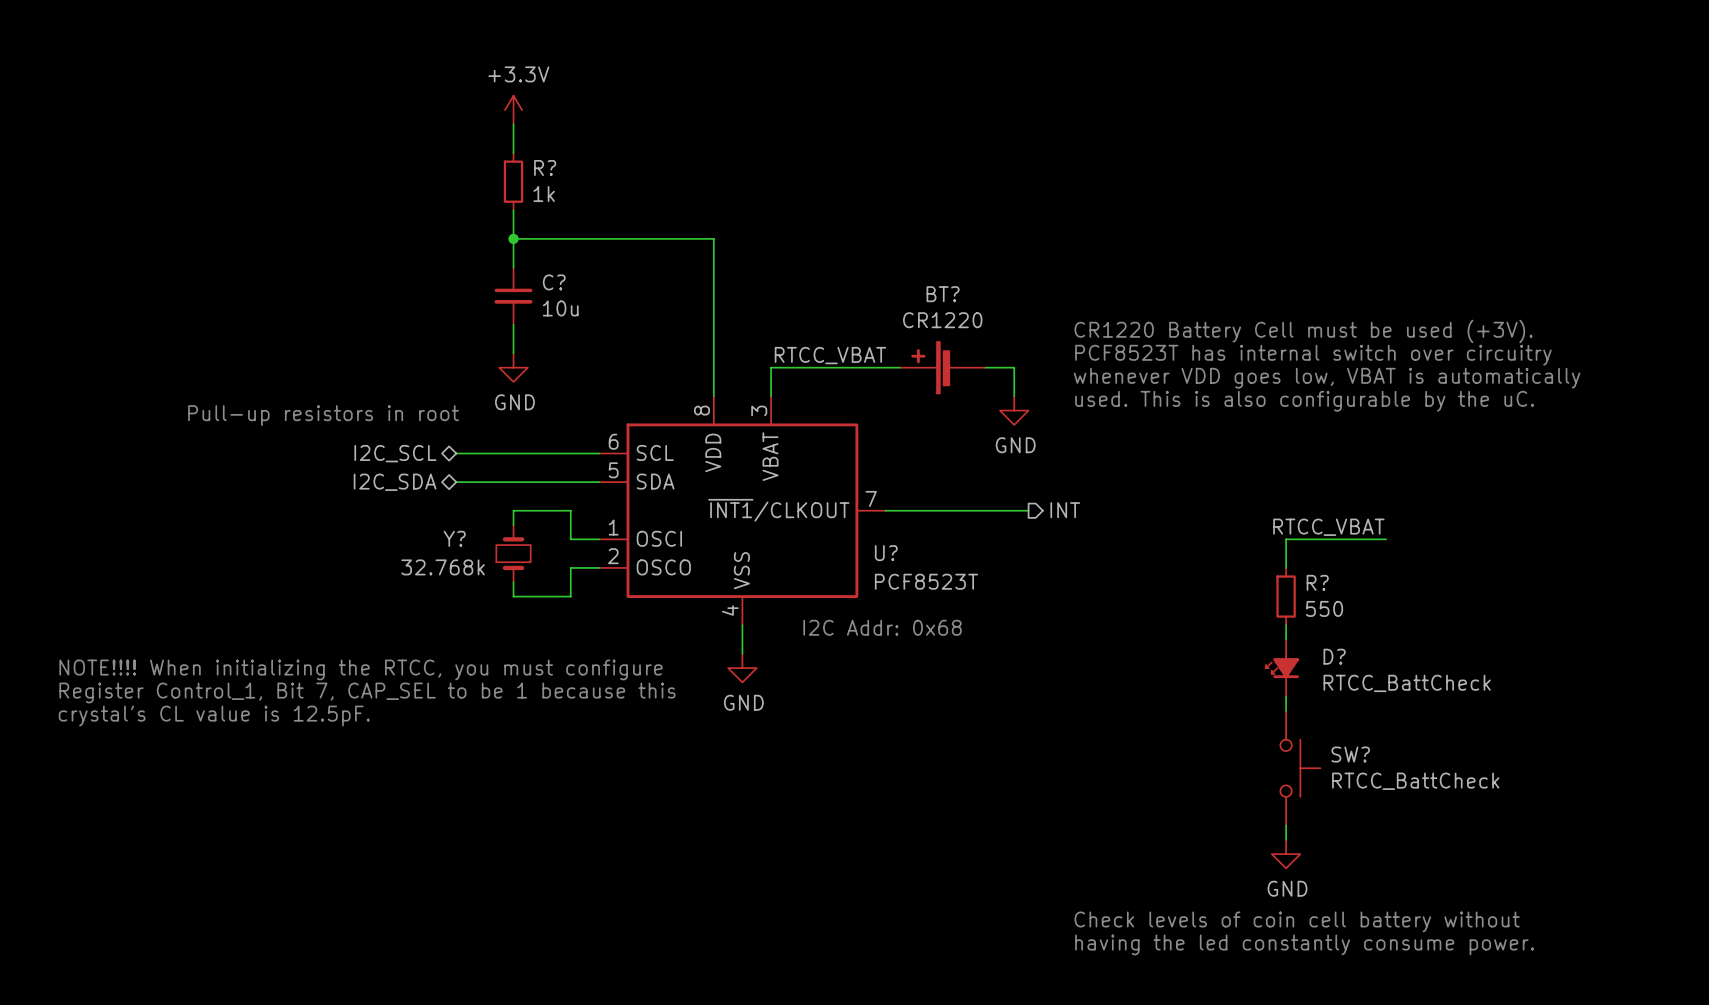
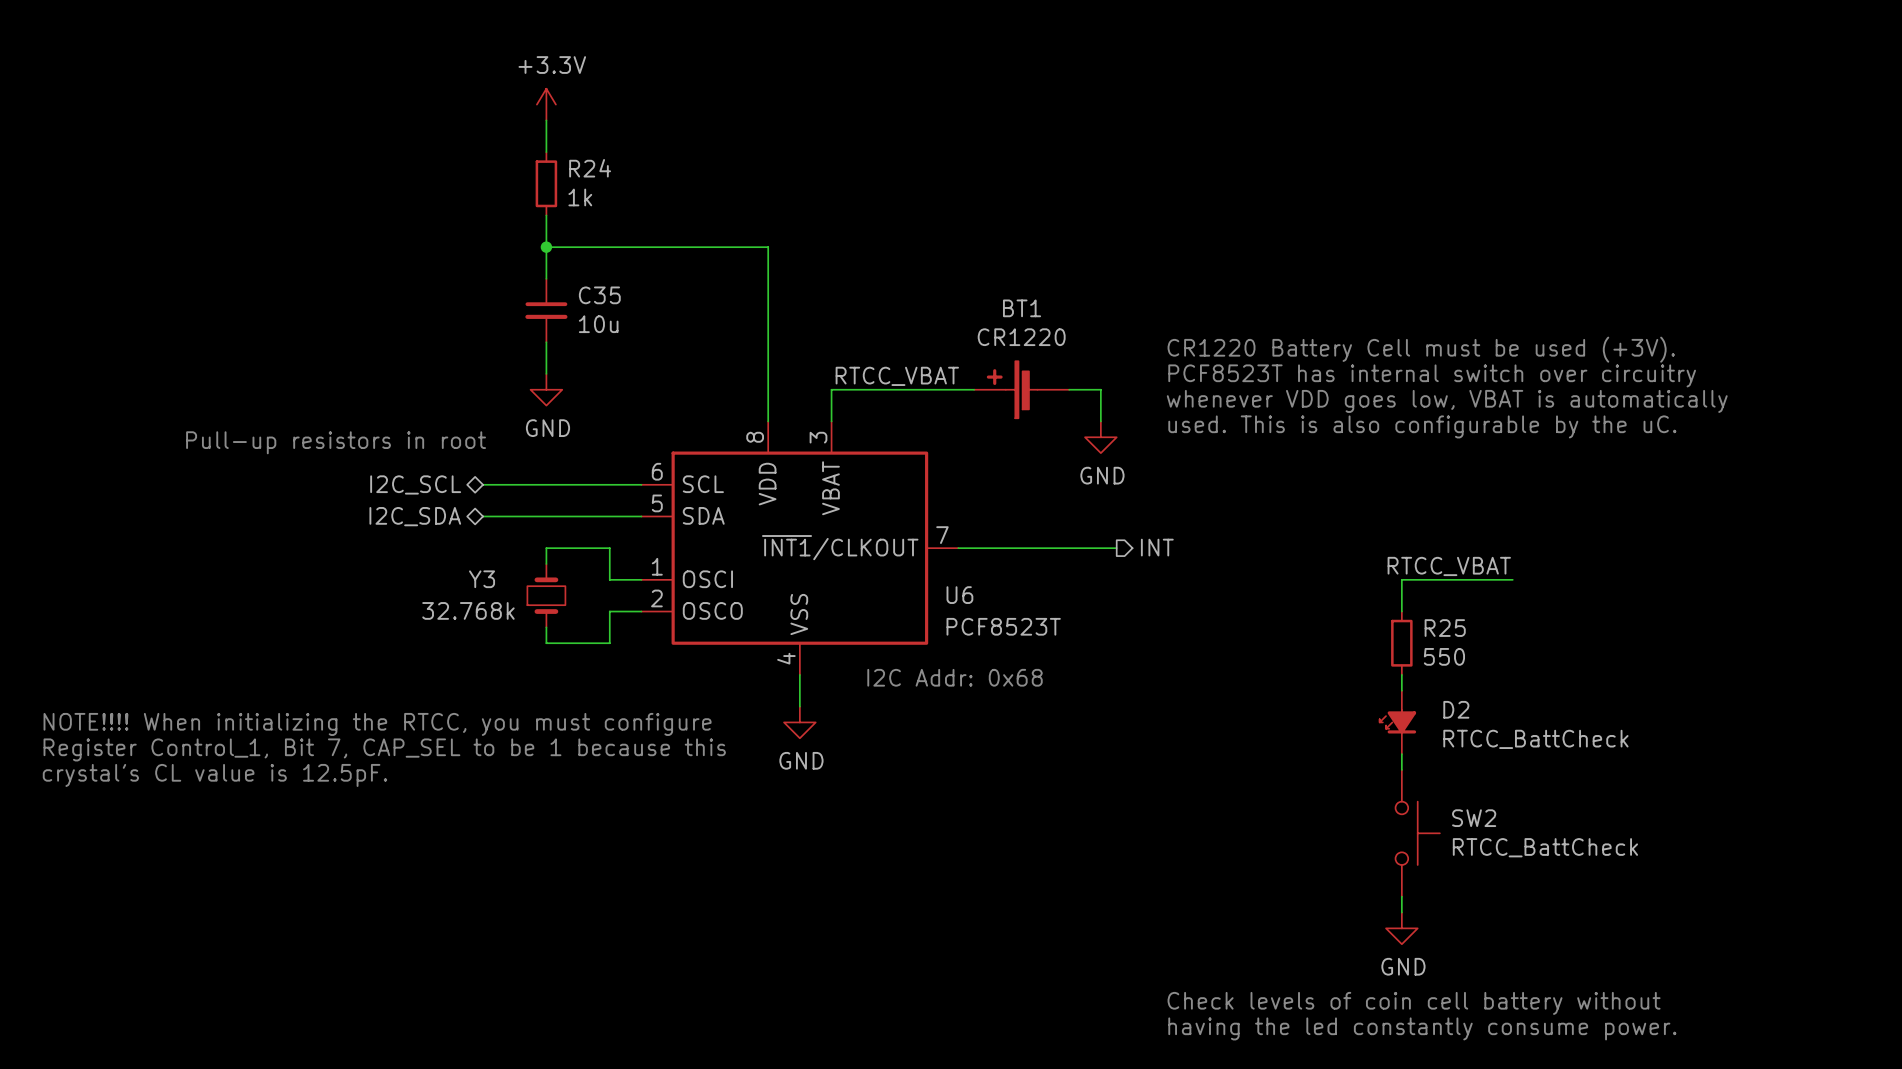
R? name: R? (545, 167) -> R24 (590, 168)
C? name: C? (554, 282) -> C35 (599, 295)
BT? name: BT? (943, 294) -> BT1 (1022, 308)
Y? name: Y? (454, 538) -> Y3 (482, 579)
U? name: U? (886, 553) -> U6 (959, 595)
R? name: R? (1317, 582) -> R25 (1445, 628)
D? name: D? (1334, 656) -> D2 (1456, 709)
SW? name: SW? (1350, 754) -> SW2 (1474, 818)

